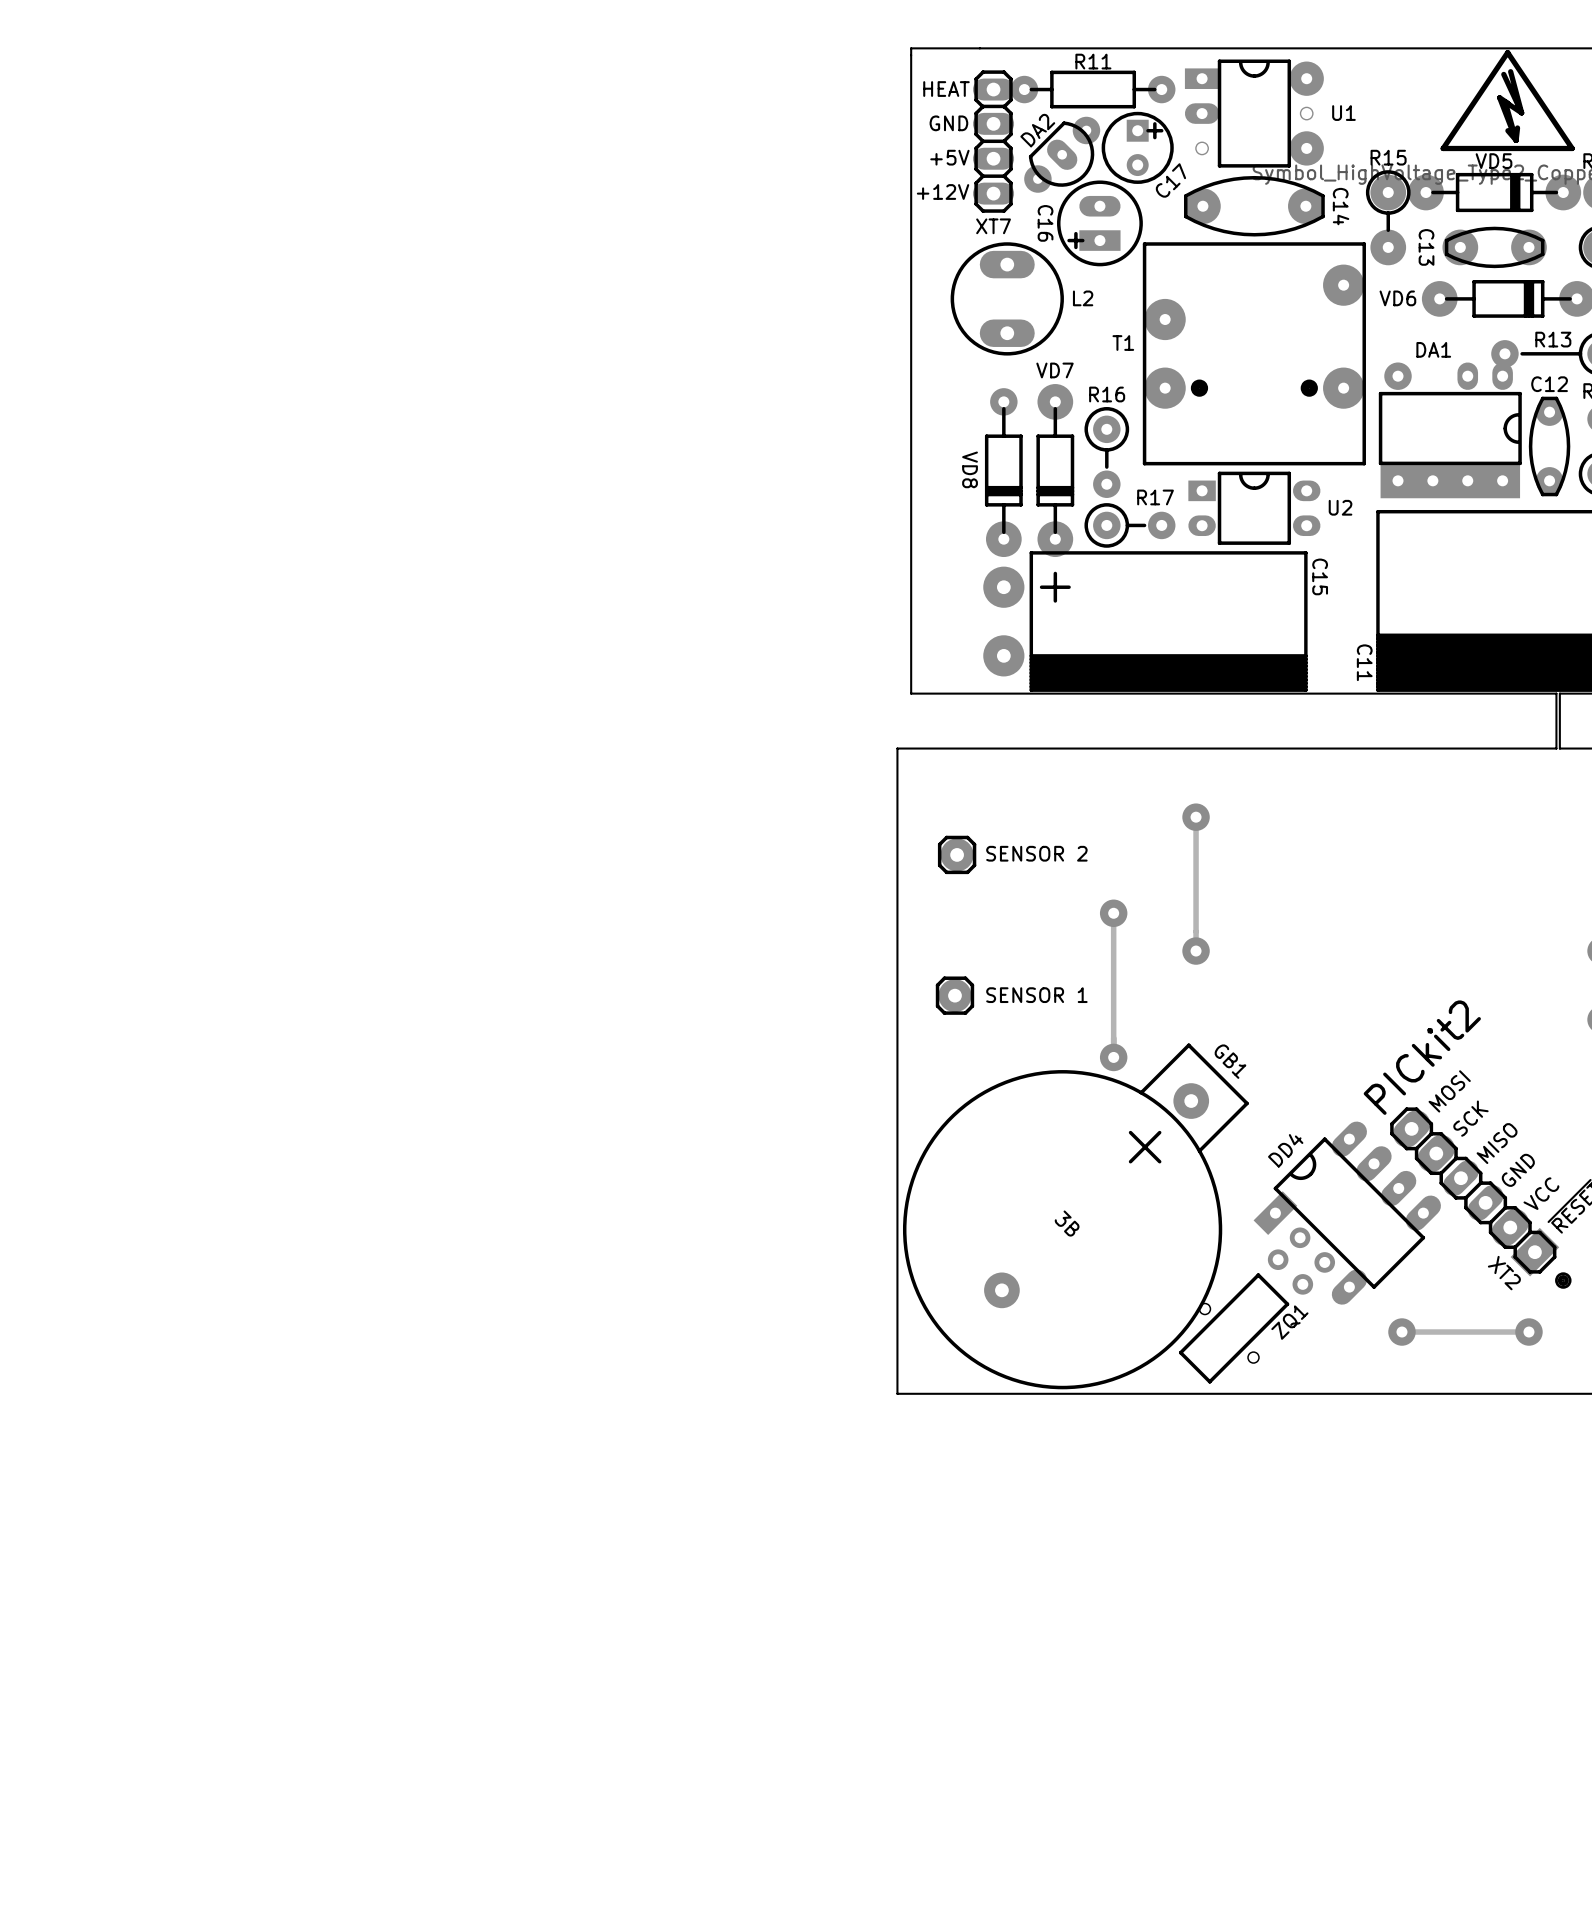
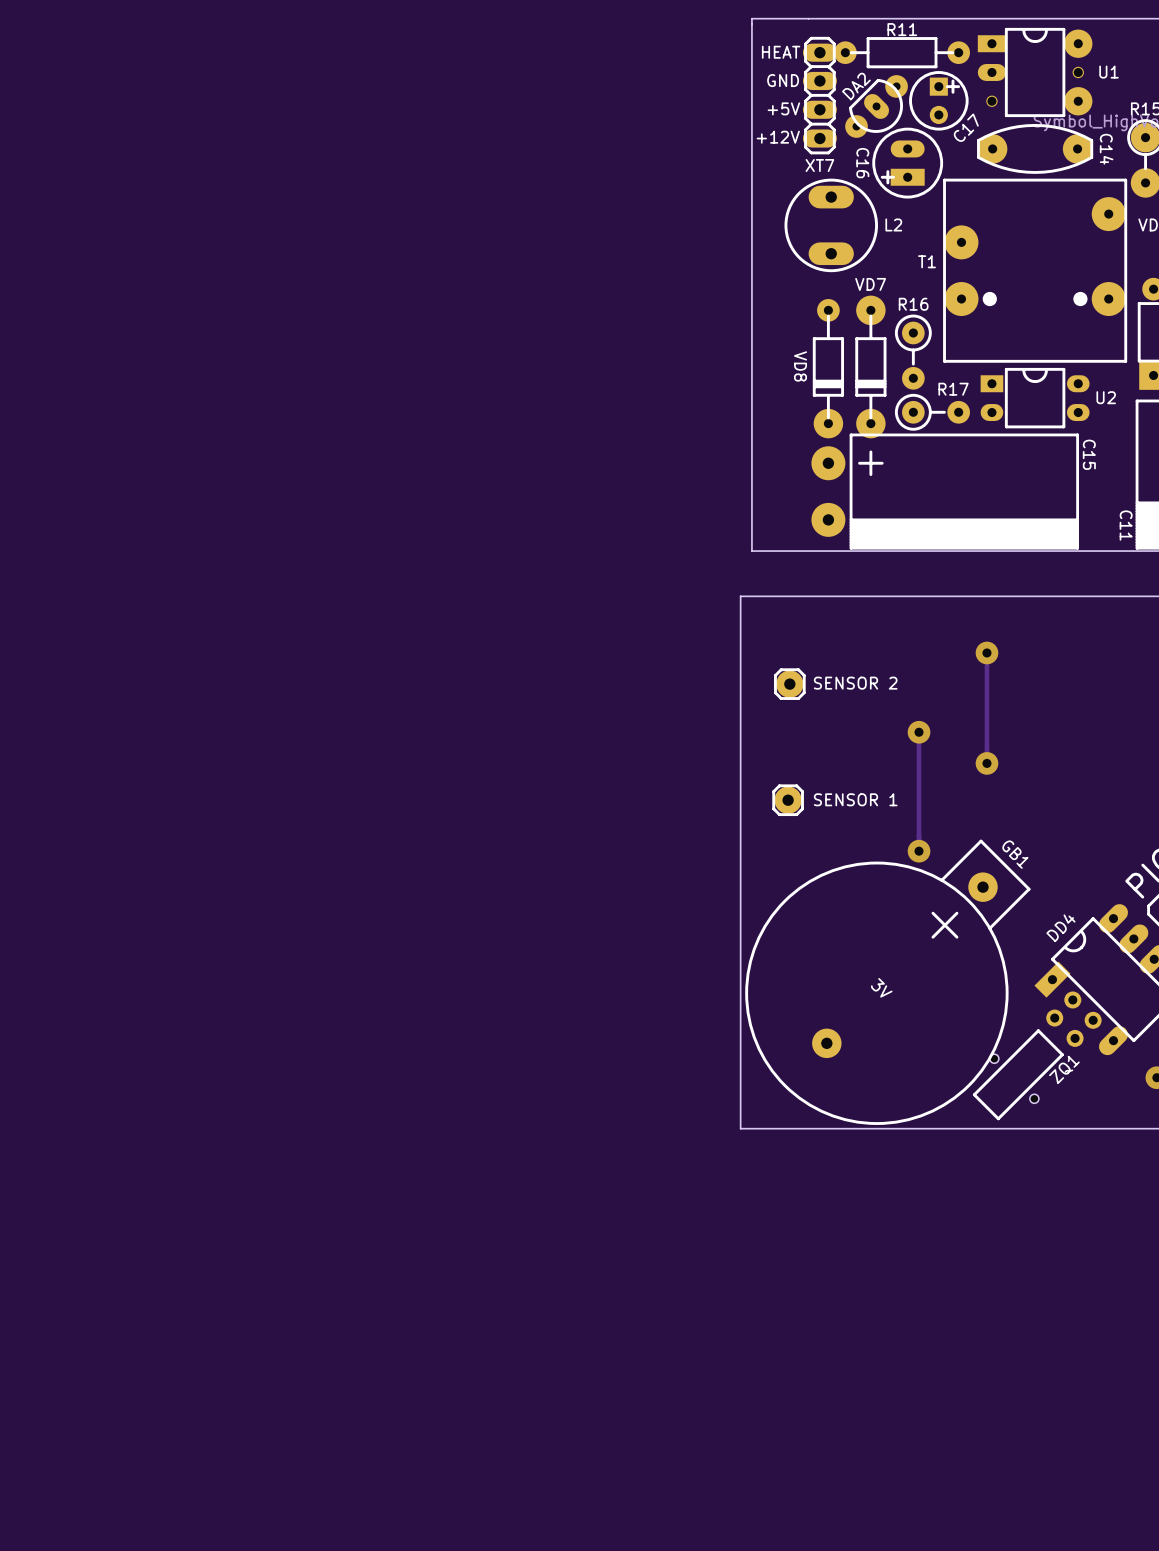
GB1 value: 3В (1067, 1223) -> 3V (881, 987)

